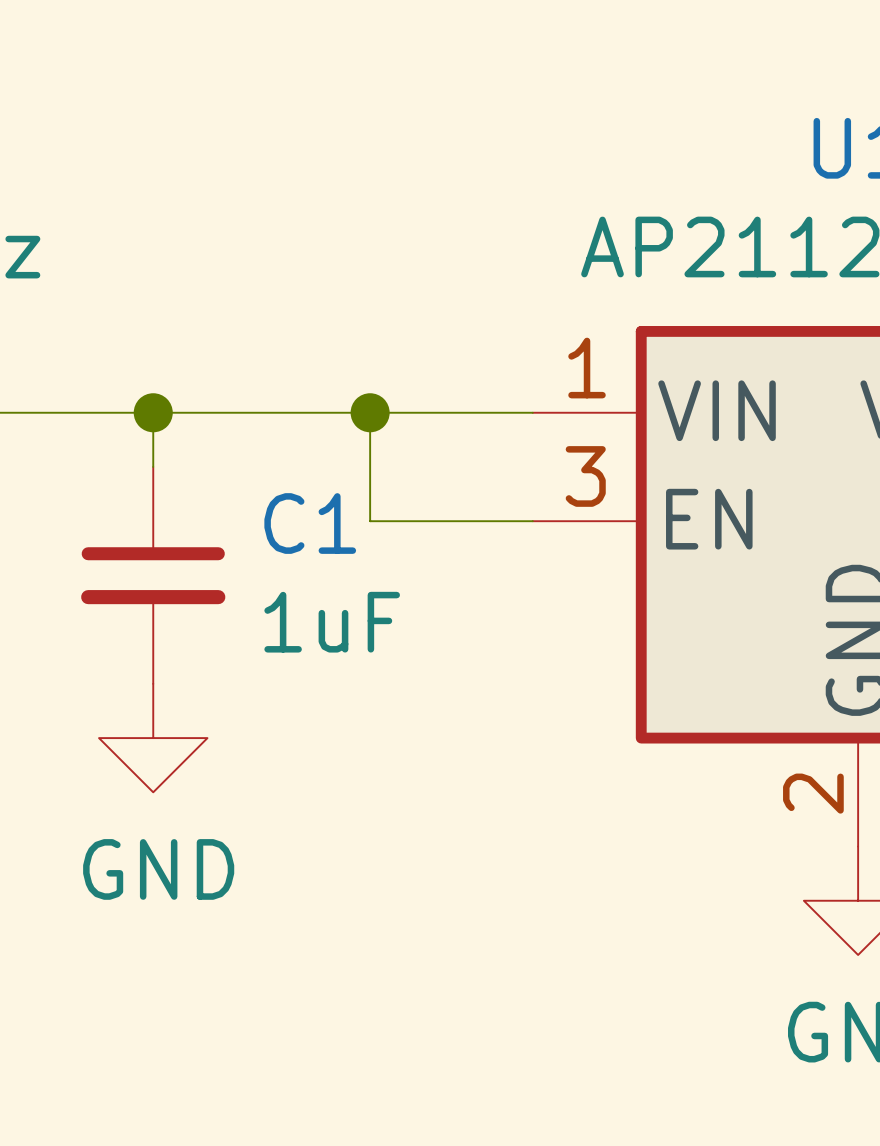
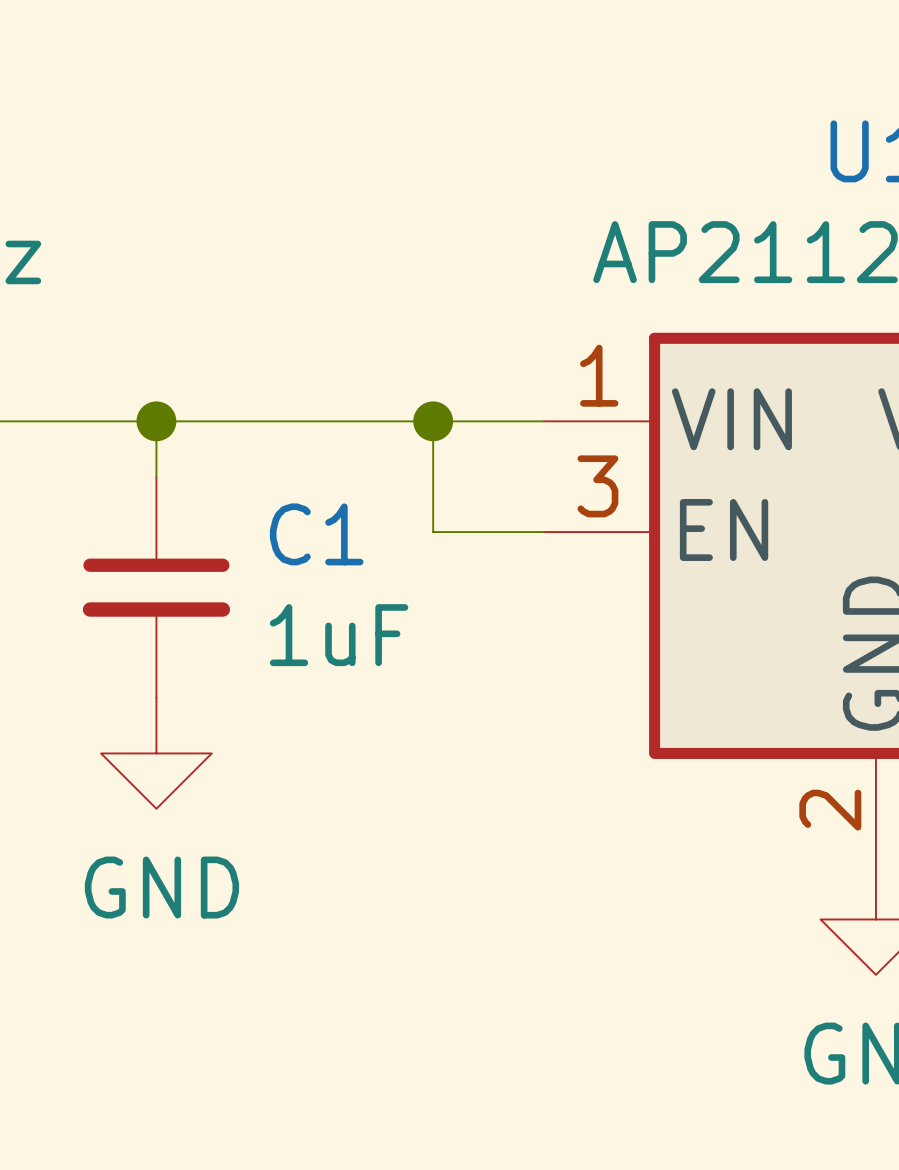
wire: (370, 412) (370, 521) (424, 521) -> (433, 421) (433, 532)
junction position: (370, 412) -> (433, 421)

